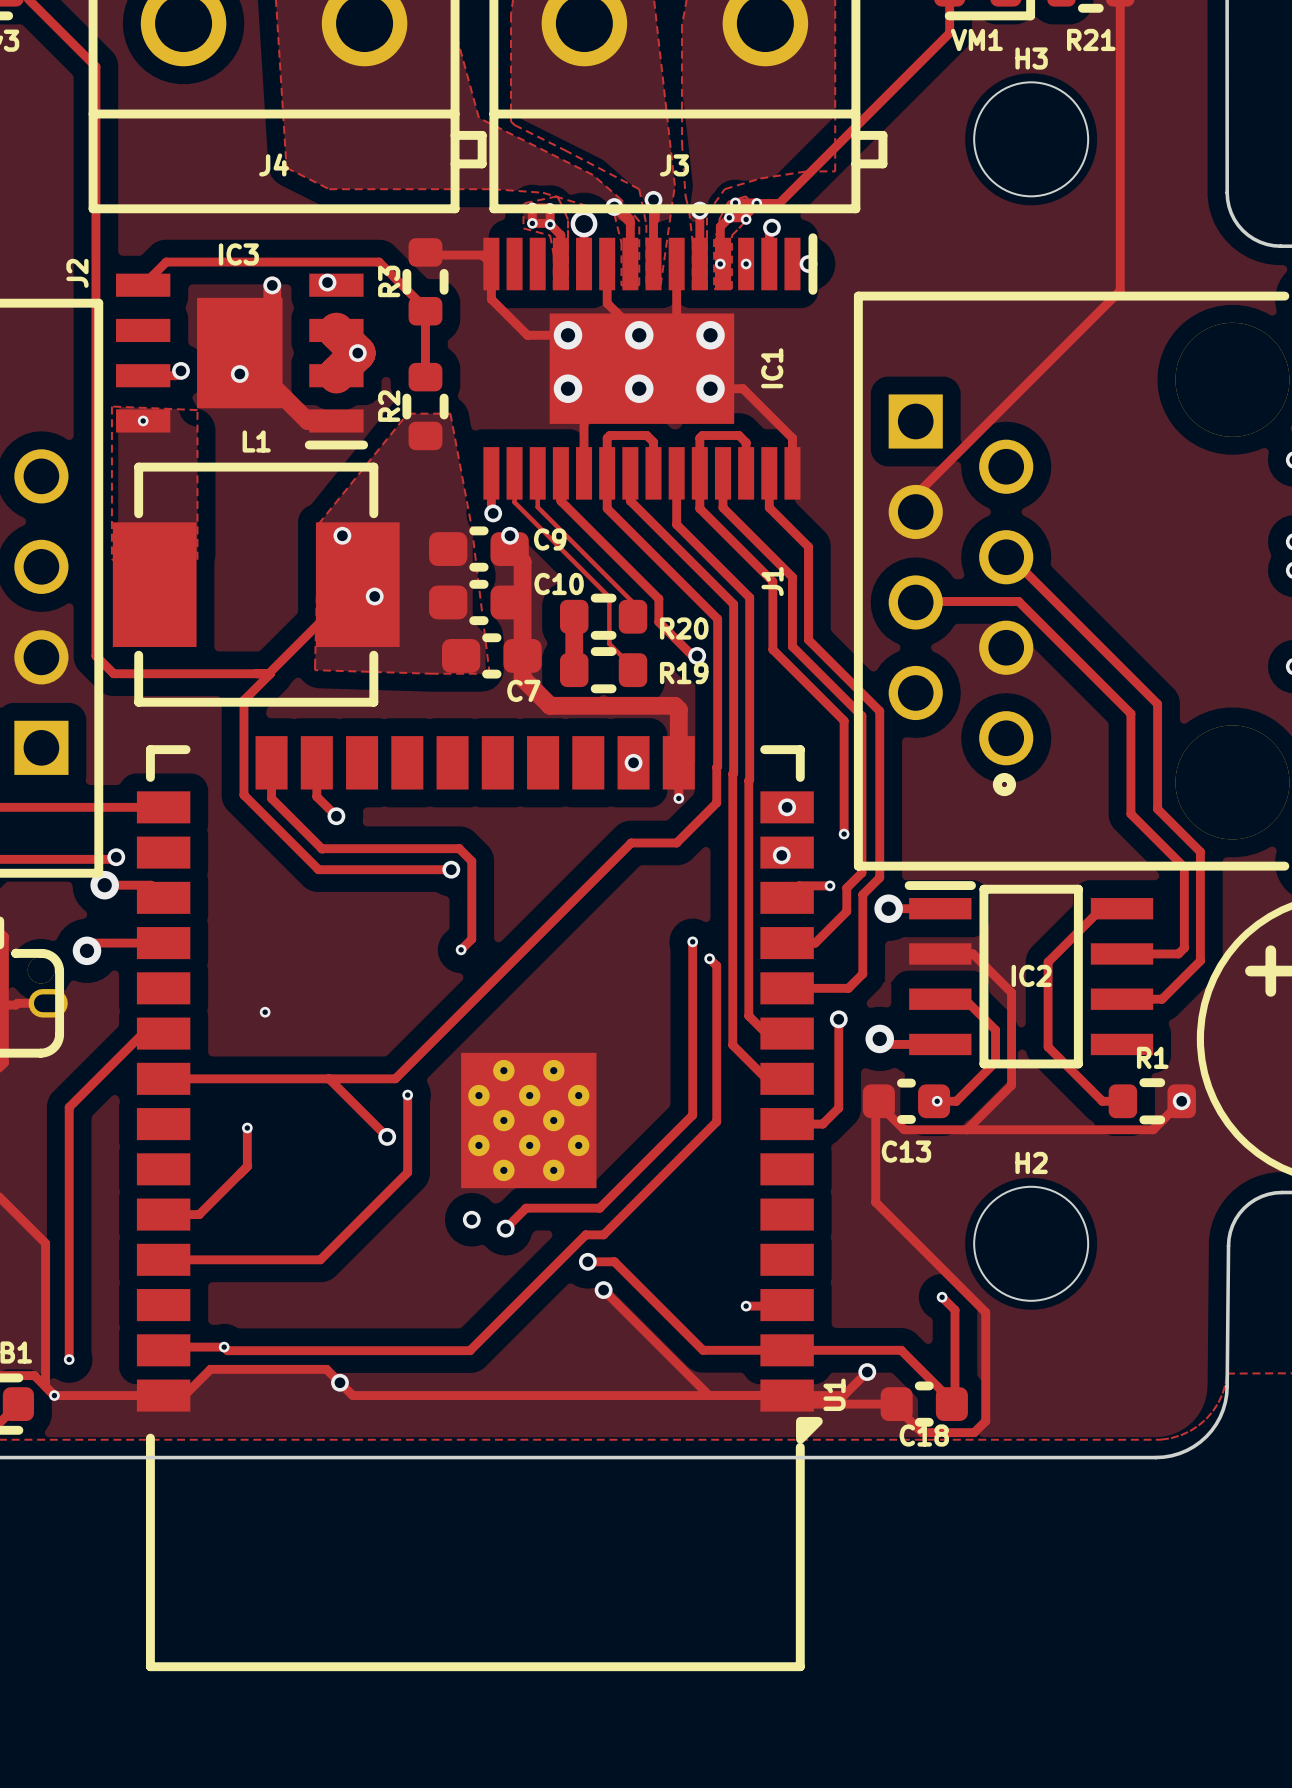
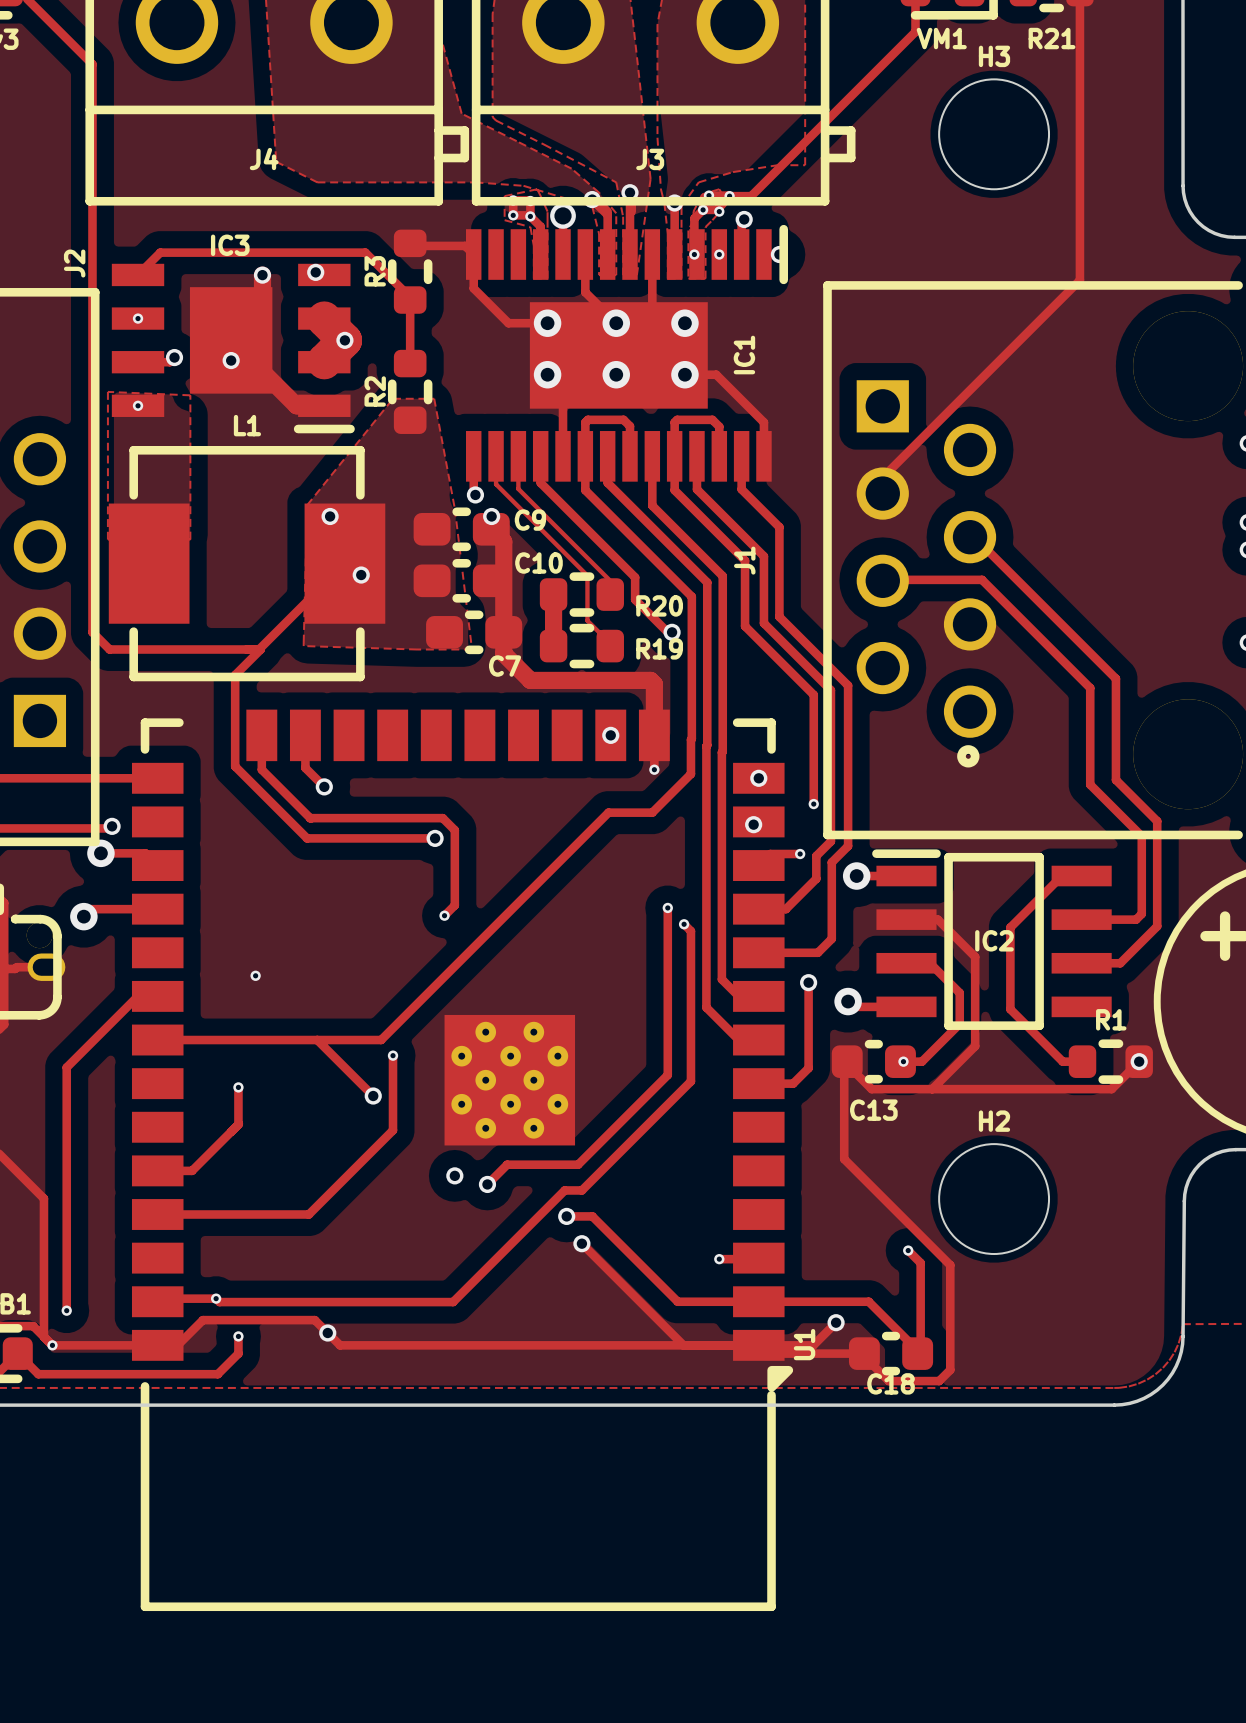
via: none -> (138, 318)
track: none -> (238, 1336) (238, 1353) (217, 1374) (38, 1374) (17, 1353)
via: none -> (238, 1336)

